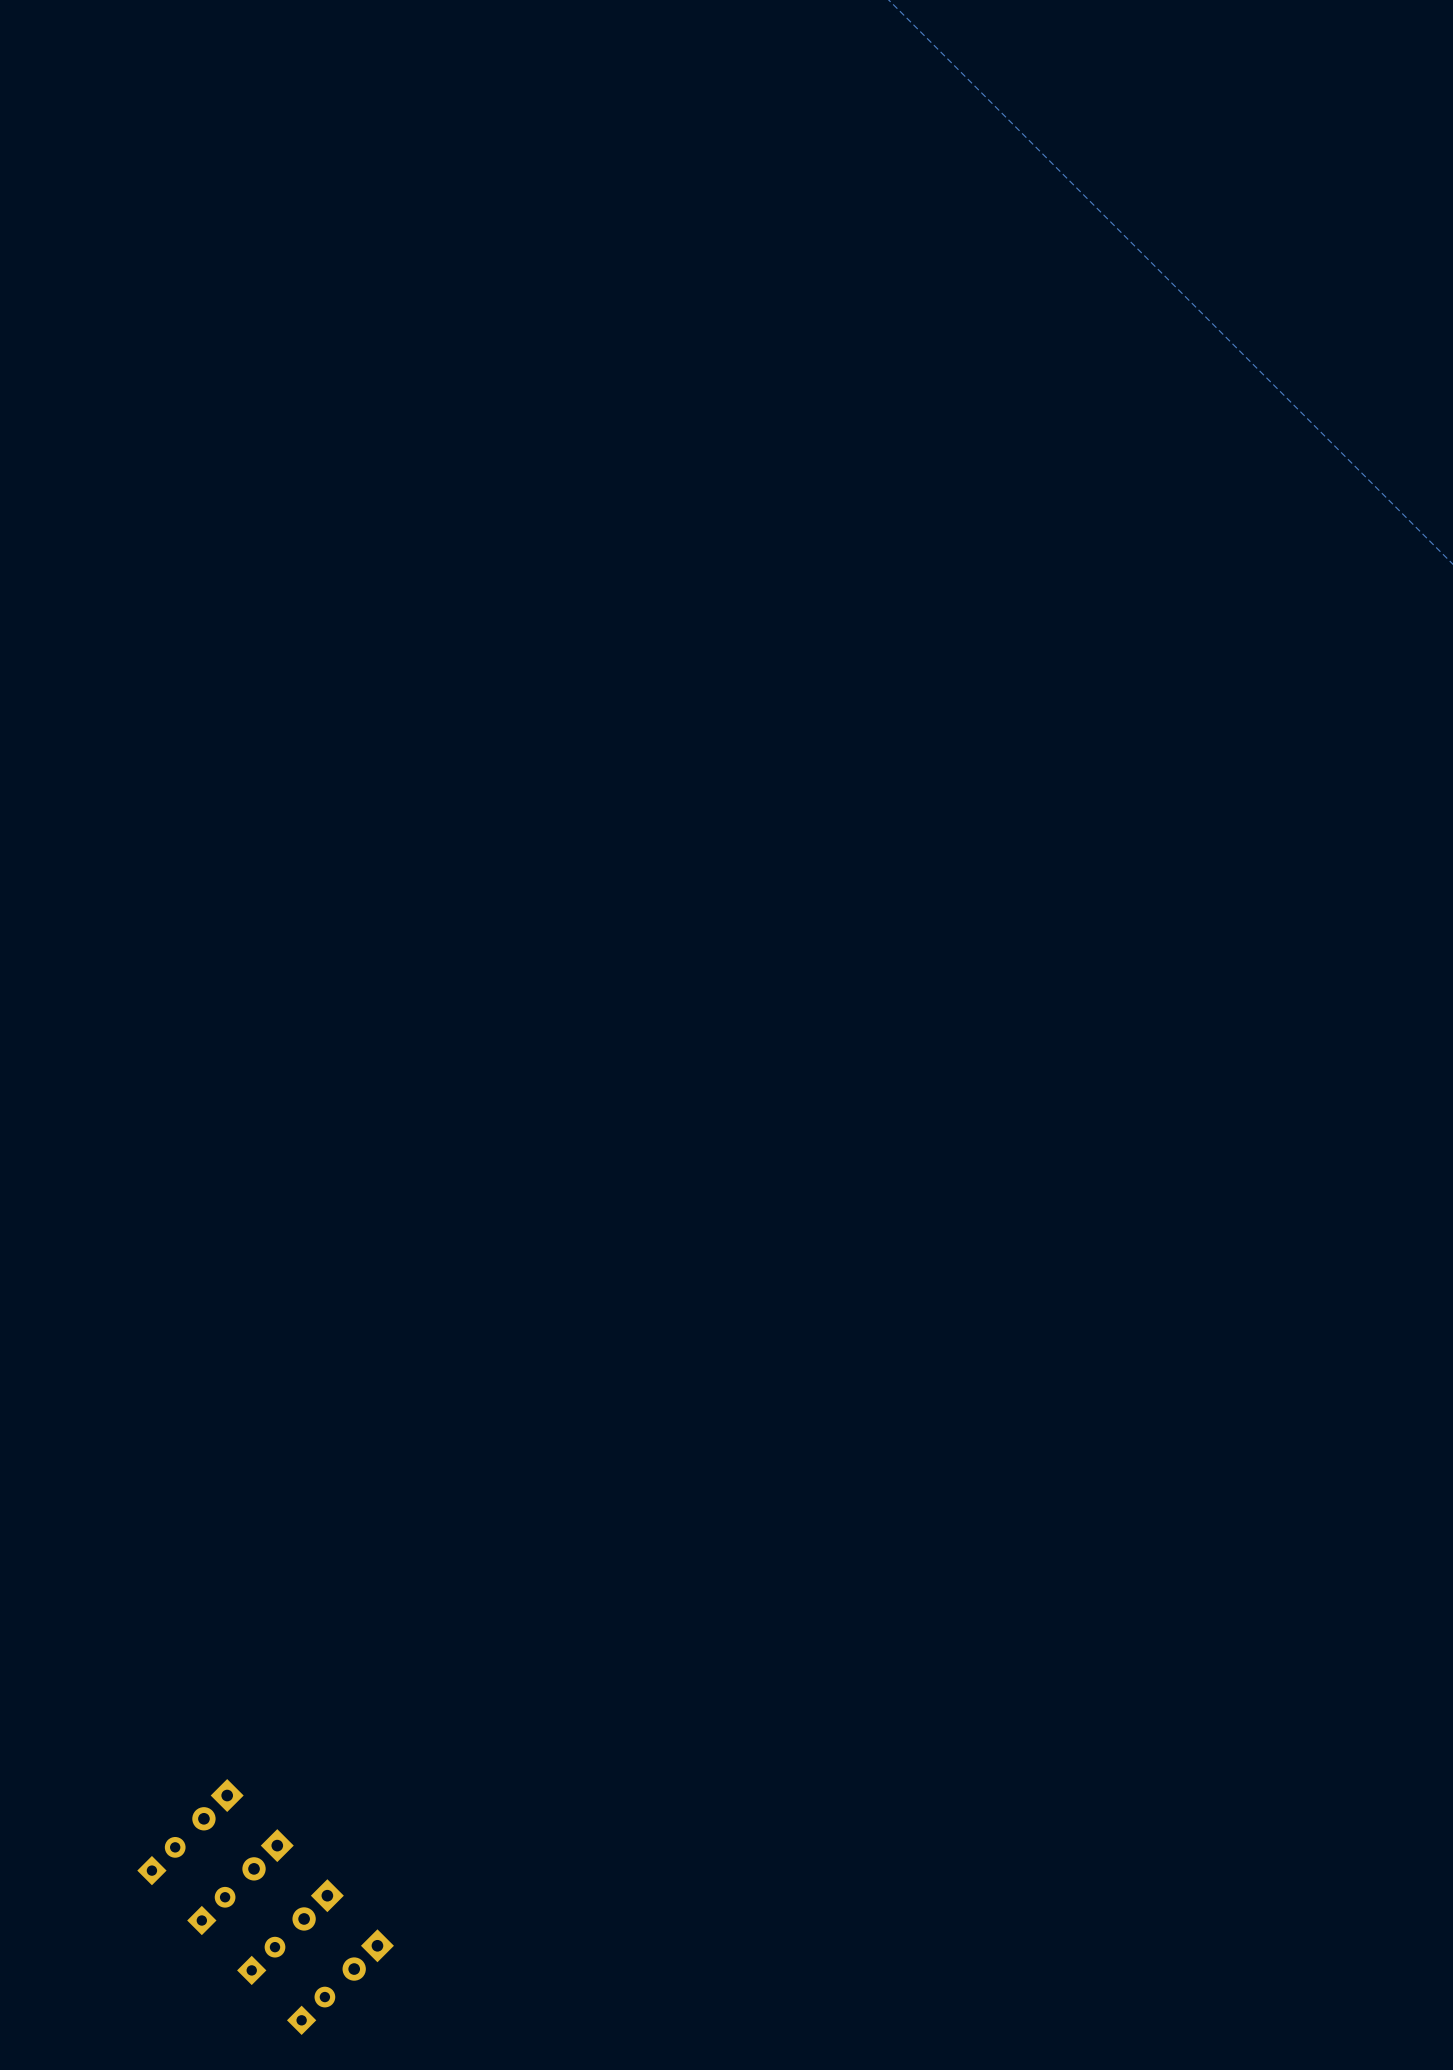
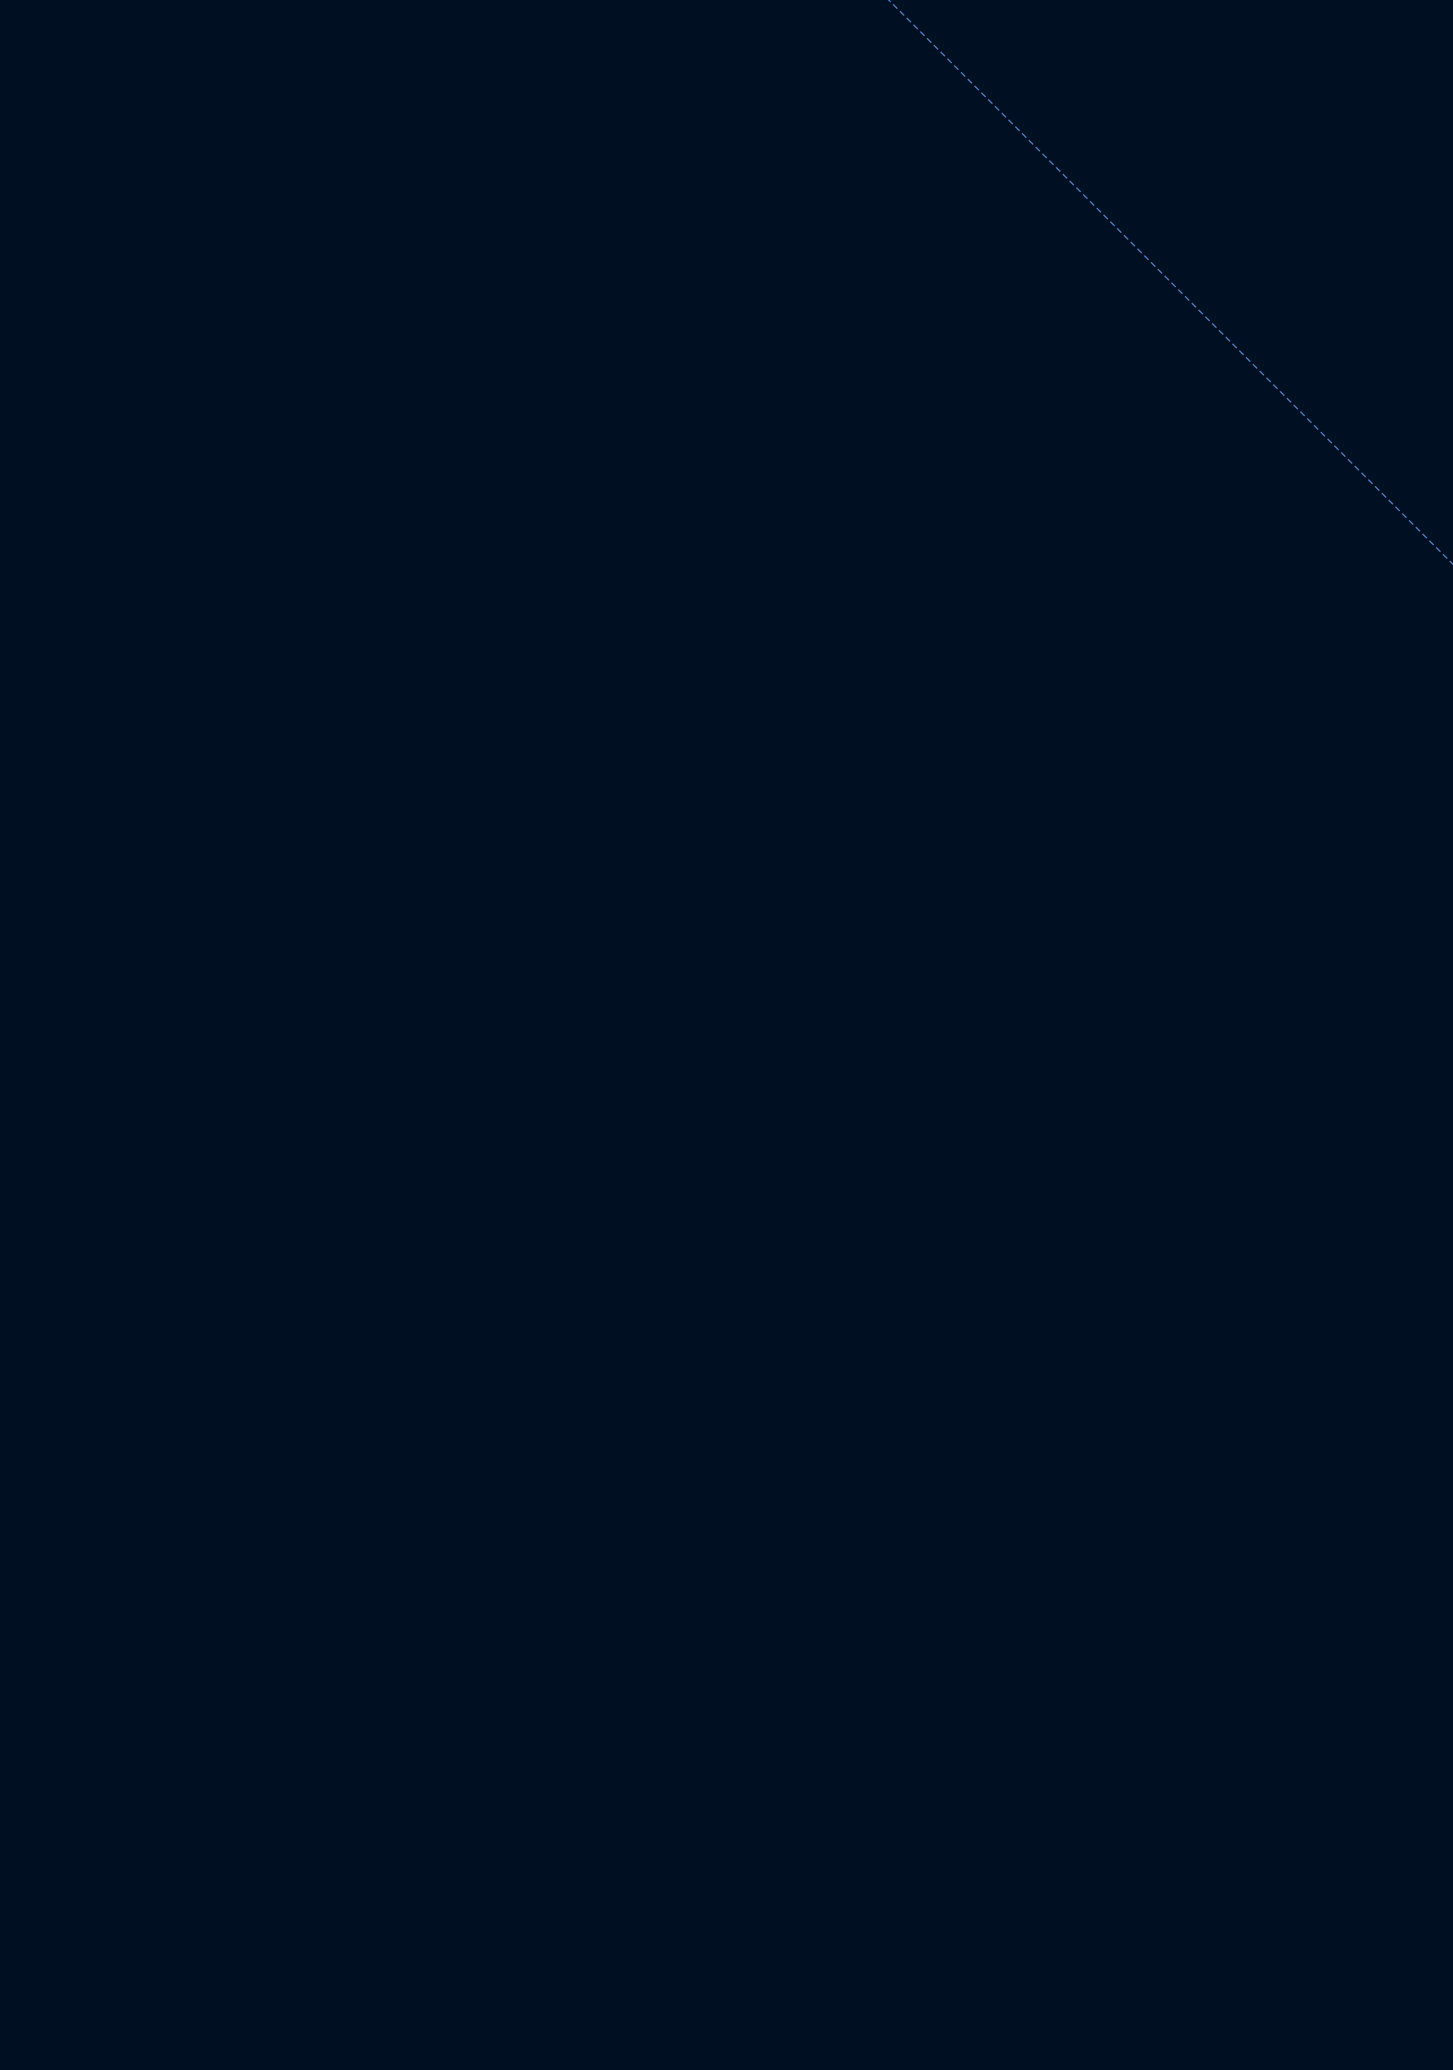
part: (217, 1804) -> none
part: (268, 1854) -> none
part: (161, 1861) -> none
part: (318, 1904) -> none
part: (211, 1911) -> none
part: (368, 1955) -> none
part: (261, 1960) -> none
part: (311, 2010) -> none

